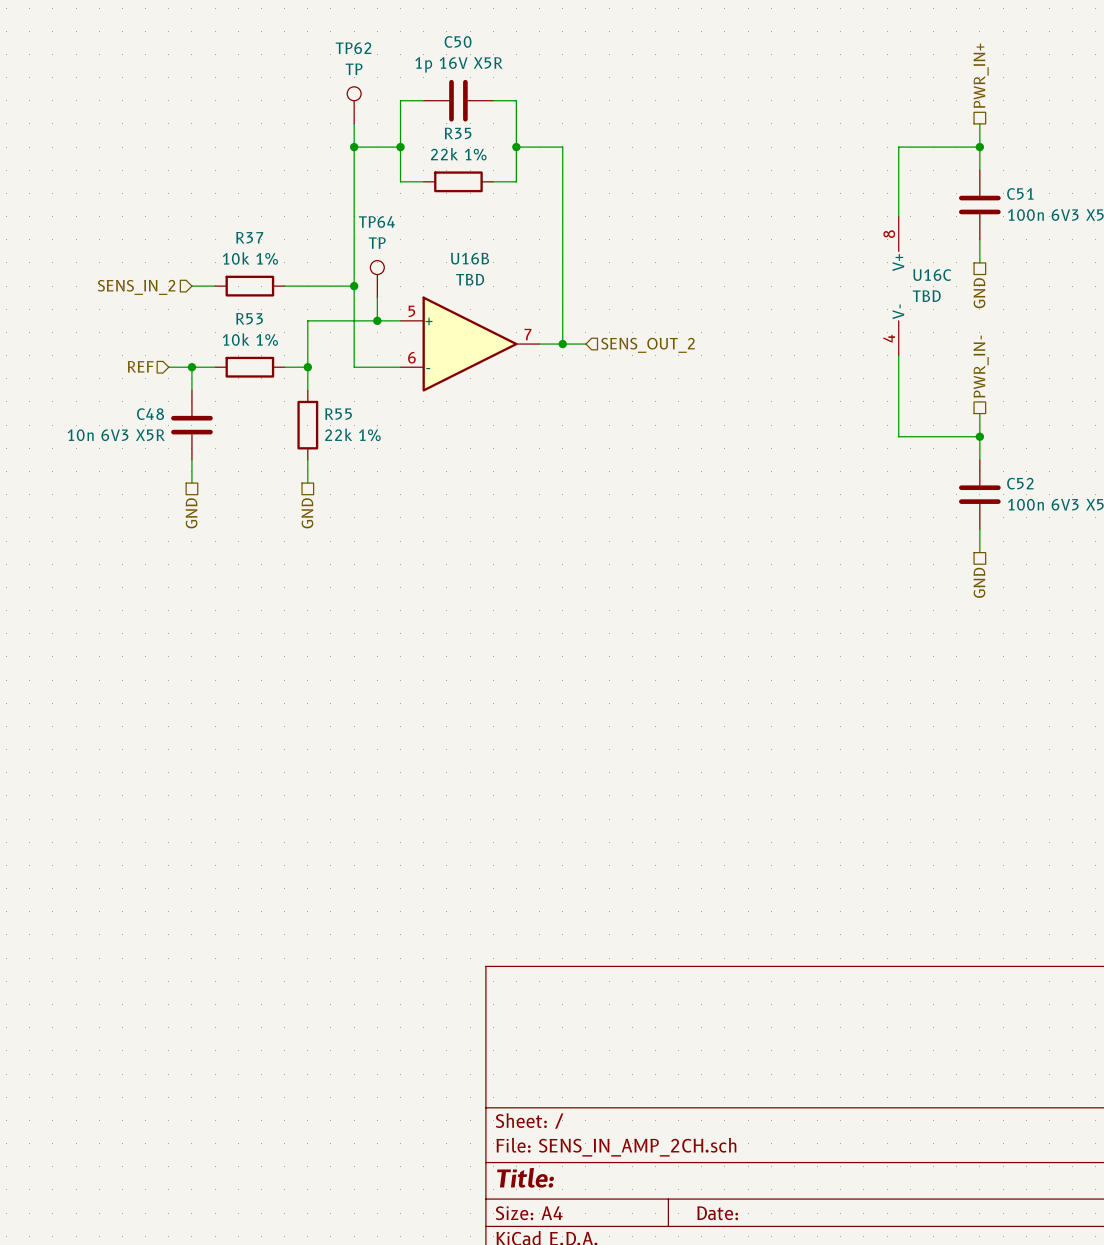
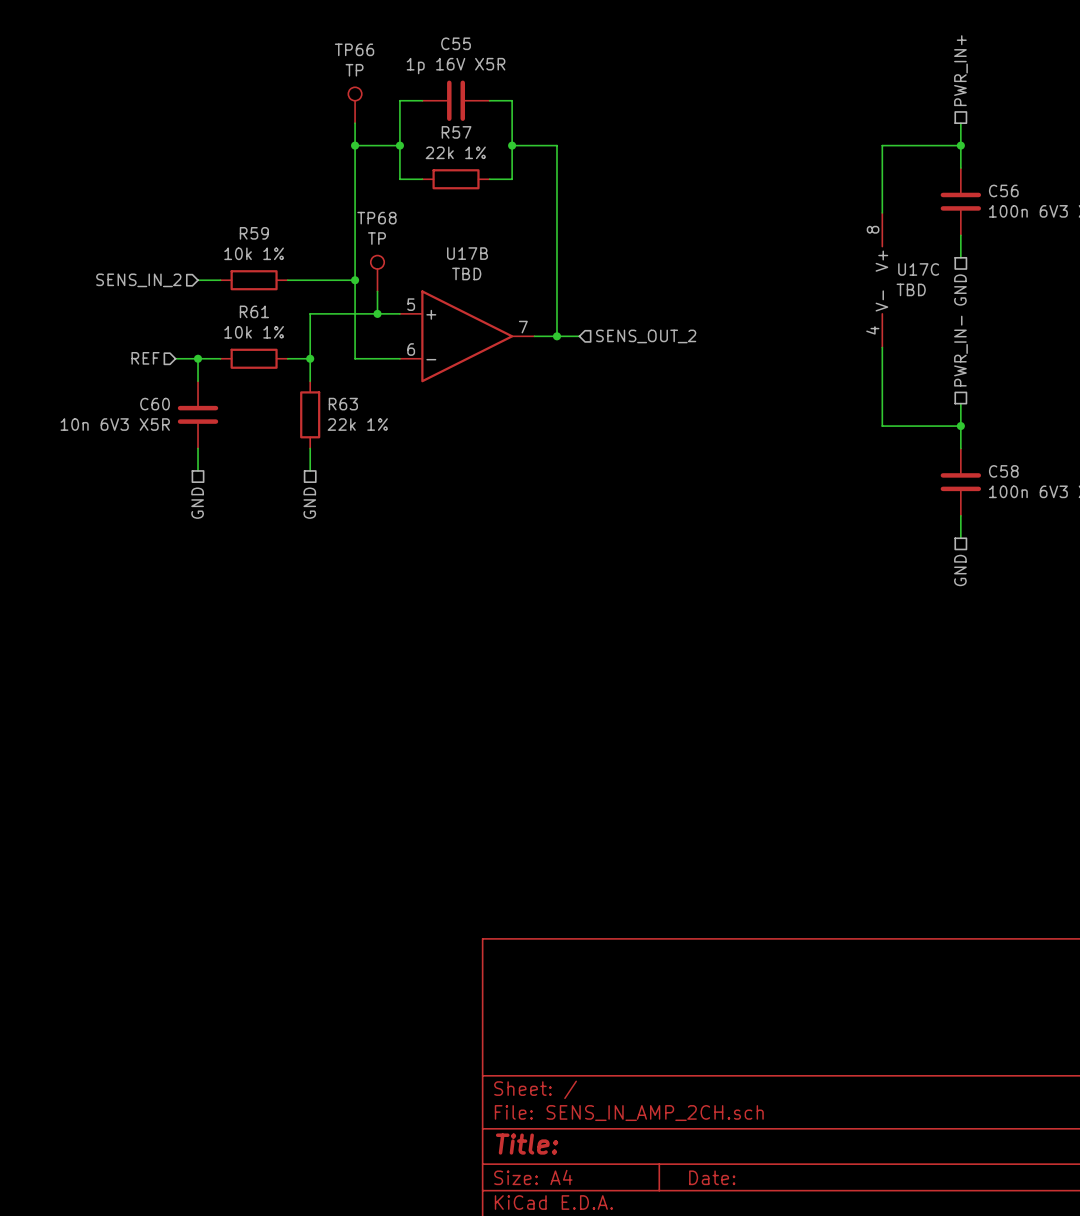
C50 name: C50 (458, 41) -> C55 (456, 43)
TP62 name: TP62 (353, 48) -> TP66 (354, 49)
R35 name: R35 (458, 133) -> R57 (456, 132)
C51 name: C51 (1020, 193) -> C56 (1003, 190)
TP64 name: TP64 (376, 222) -> TP68 (376, 218)
R37 name: R37 (249, 237) -> R59 (254, 233)
U16B name: U16B (470, 258) -> U17B (467, 253)
U16C name: U16C (932, 275) -> U17C (918, 269)
R53 name: R53 (249, 318) -> R61 (254, 311)
C48 name: C48 (150, 414) -> C60 (155, 404)
R55 name: R55 (338, 414) -> R63 (343, 404)
C52 name: C52 (1020, 483) -> C58 (1003, 471)

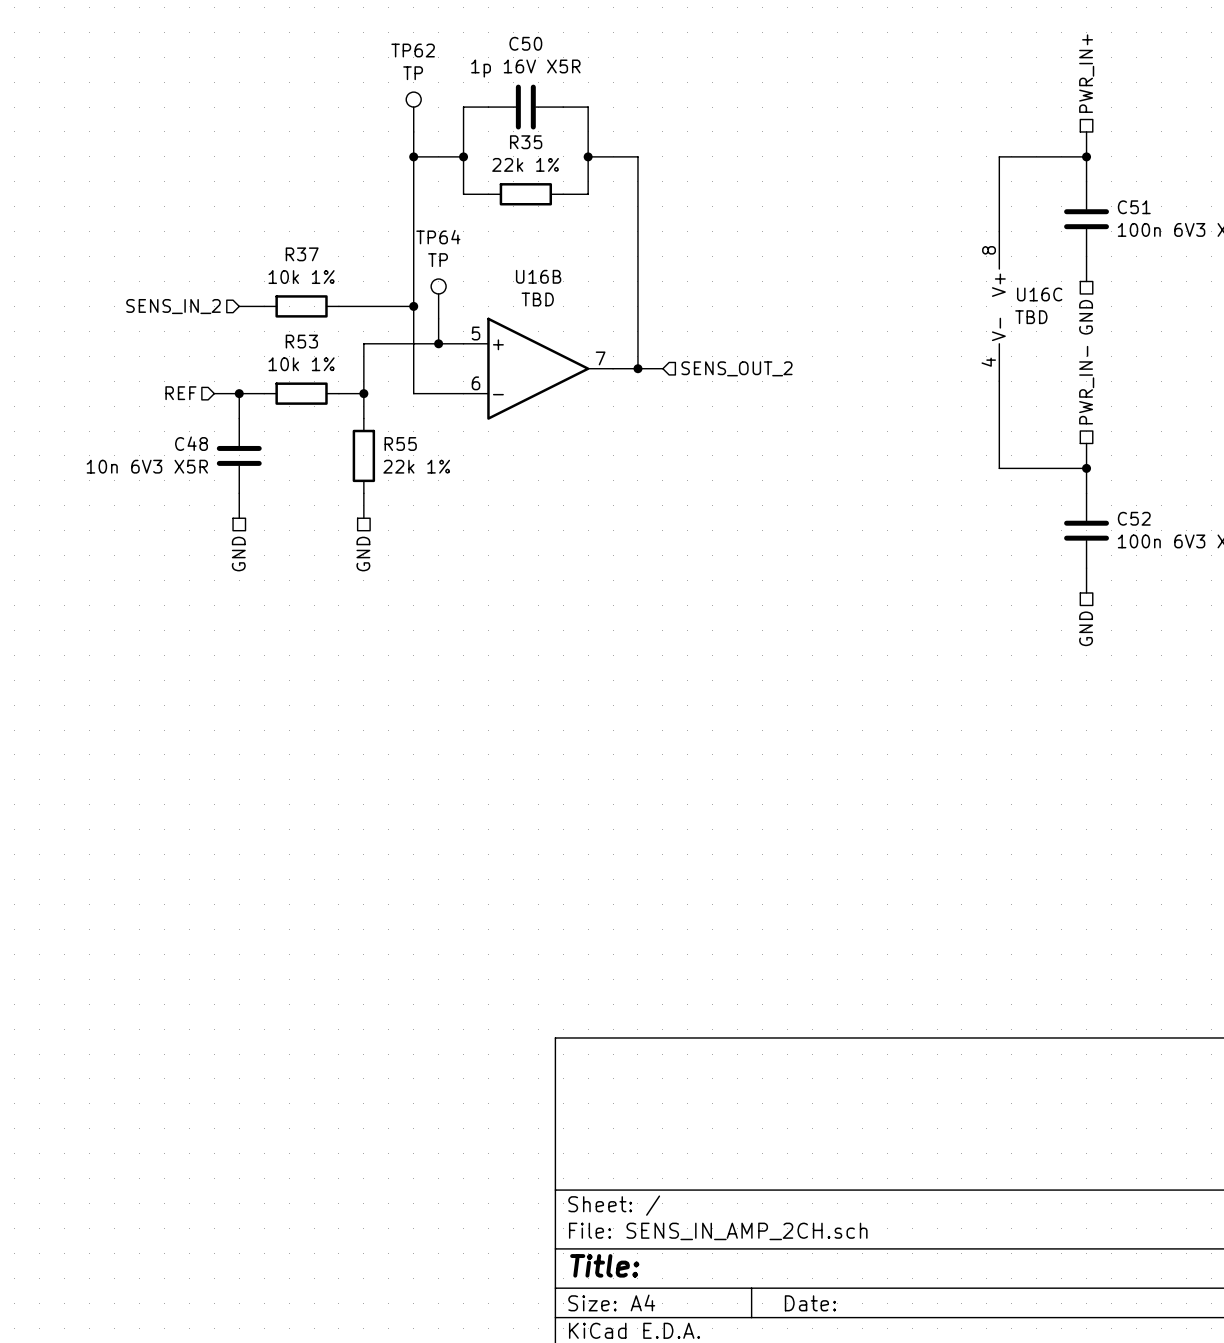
C55 name: C55 (456, 43) -> C50 (525, 43)
TP66 name: TP66 (354, 49) -> TP62 (413, 50)
R57 name: R57 (456, 132) -> R35 (526, 142)
C56 name: C56 (1003, 190) -> C51 (1134, 207)
TP68 name: TP68 (376, 218) -> TP64 (438, 237)
R59 name: R59 (254, 233) -> R37 (302, 254)
U17B name: U17B (467, 253) -> U16B (538, 276)
U17C name: U17C (918, 269) -> U16C (1039, 294)
R61 name: R61 (254, 311) -> R53 (301, 341)
C60 name: C60 (155, 404) -> C48 (191, 443)
R63 name: R63 (343, 404) -> R55 (400, 444)
C58 name: C58 (1003, 471) -> C52 (1134, 518)

